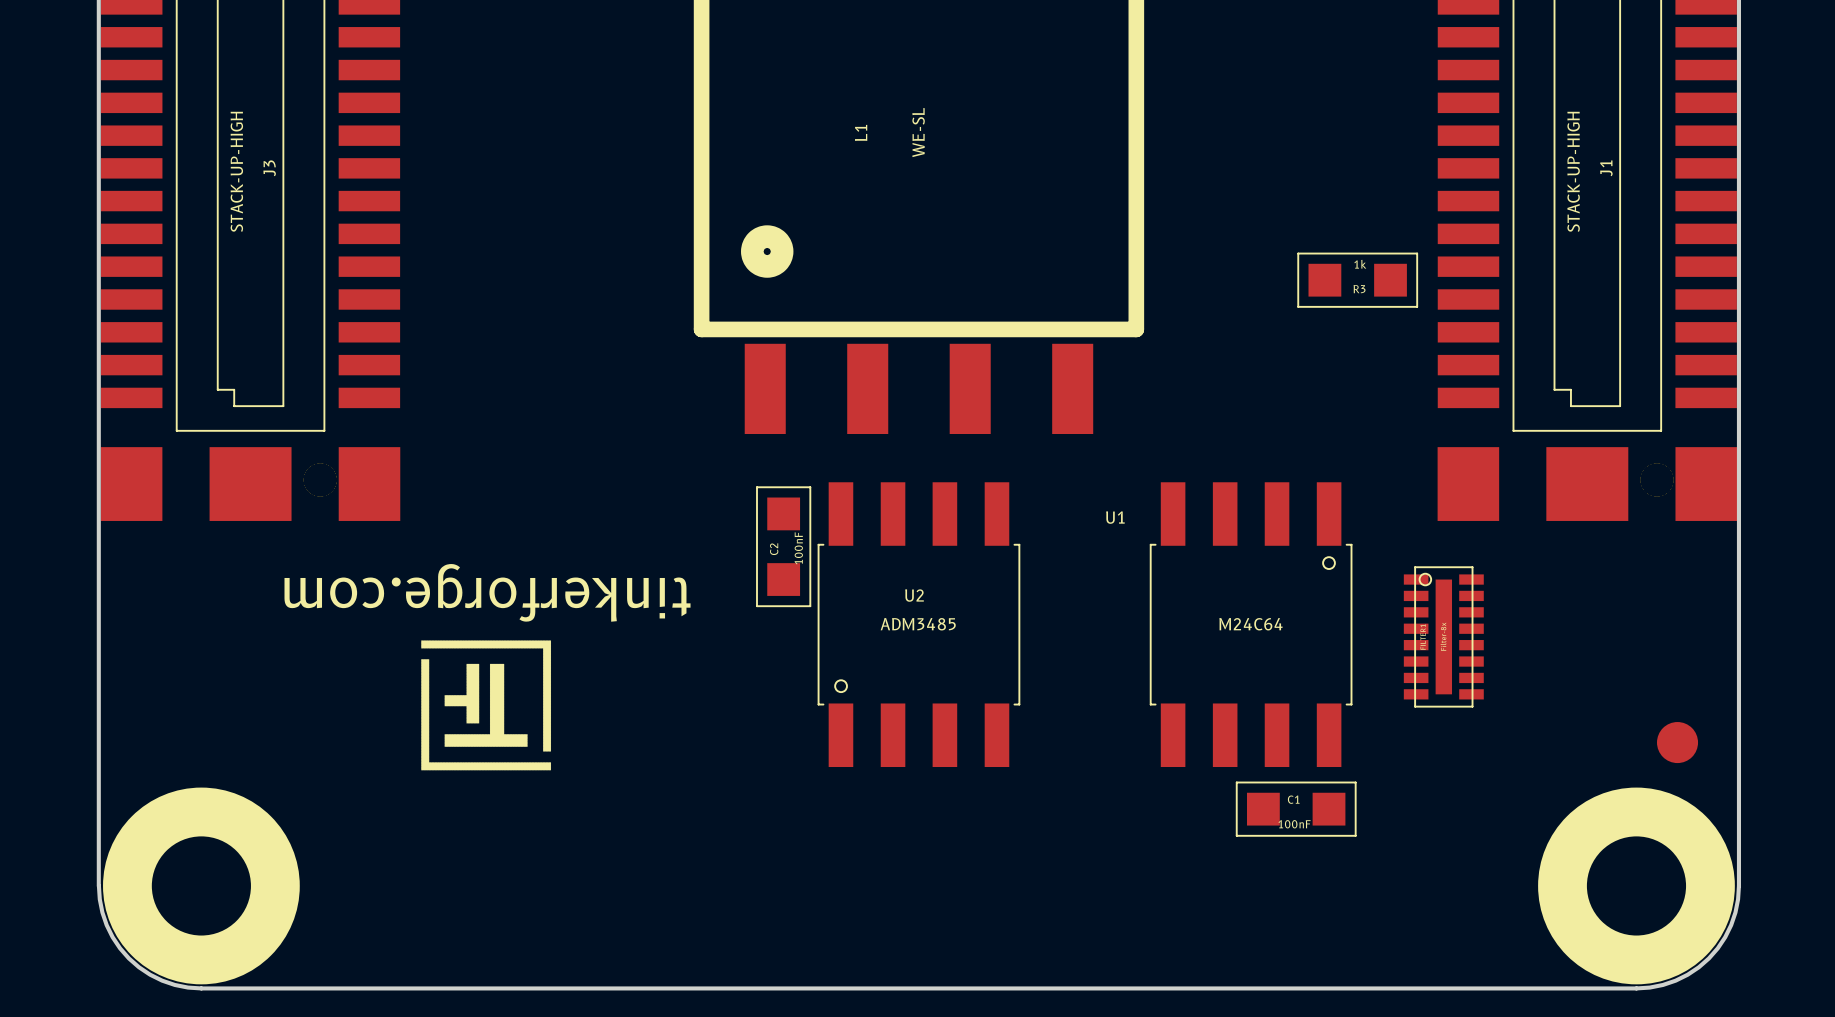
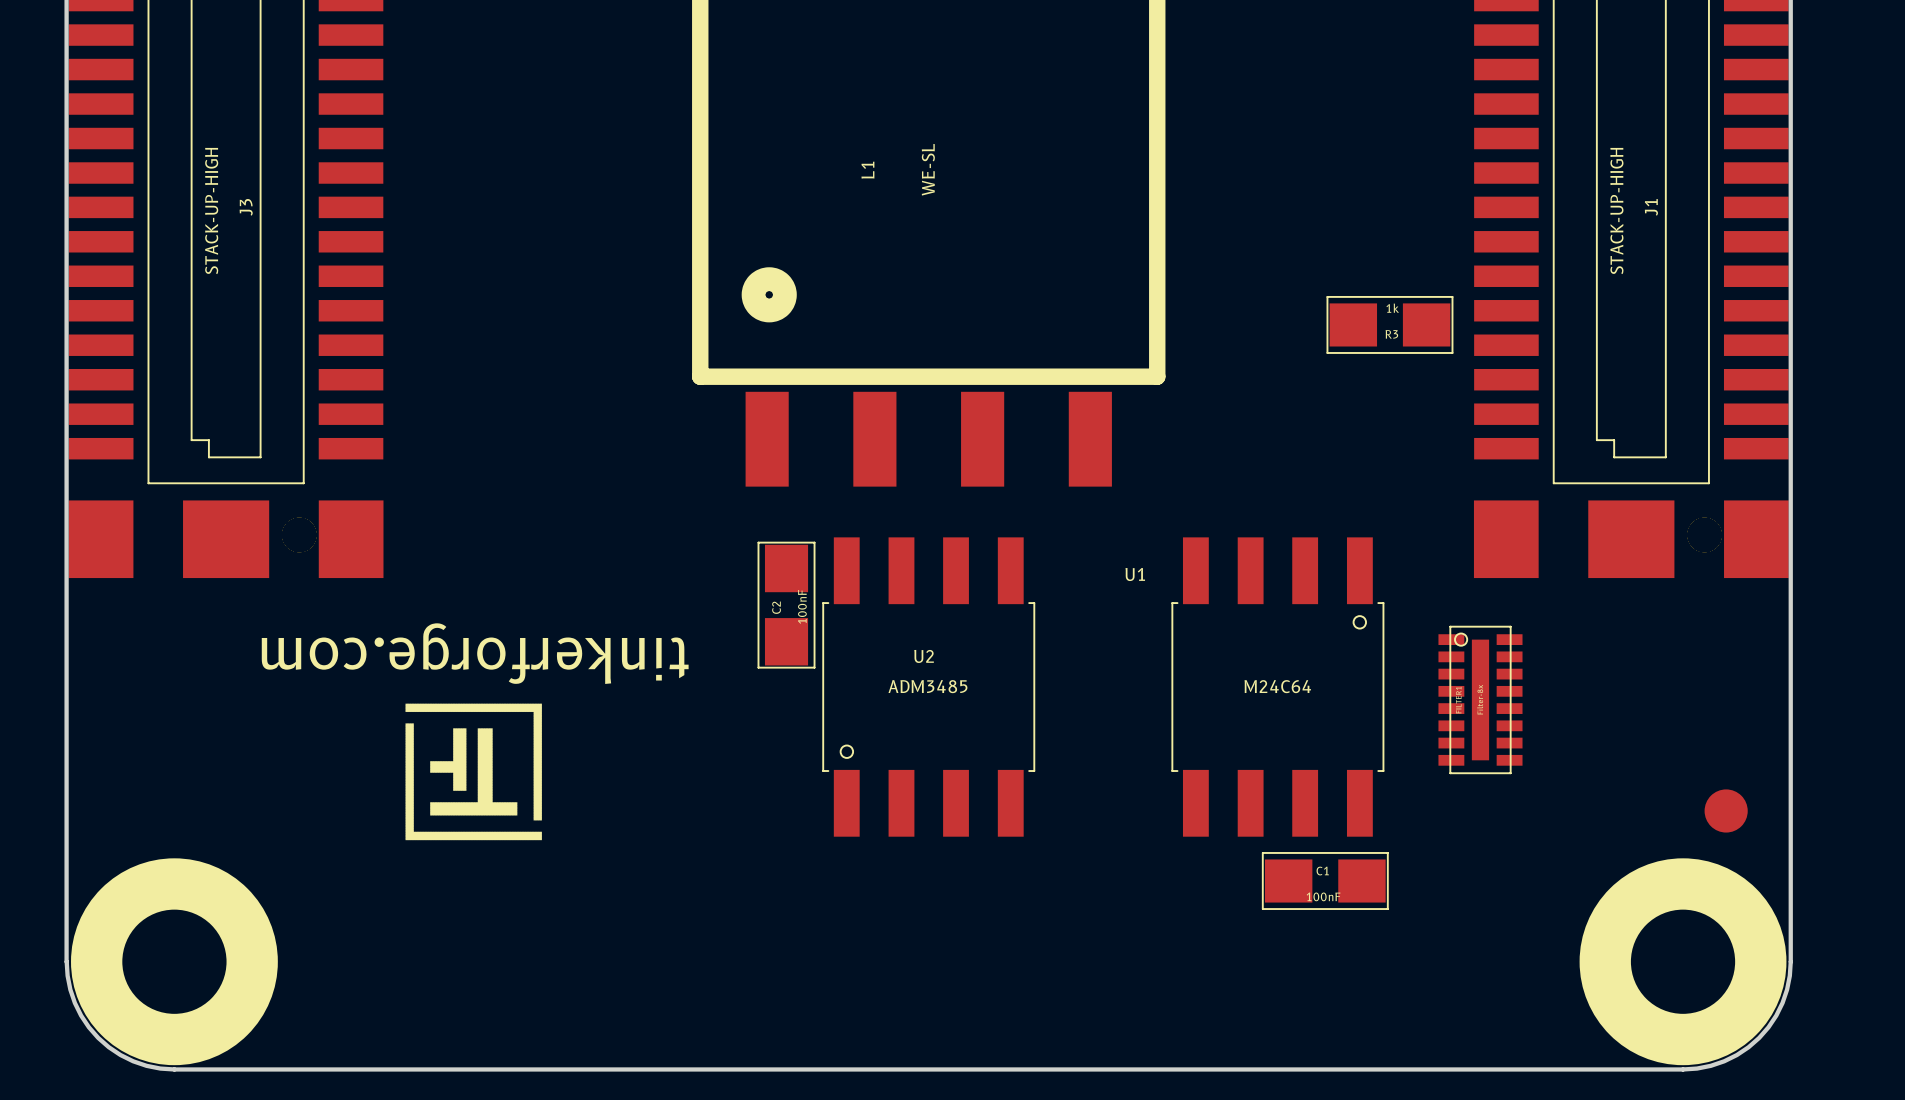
R3 footprint: [1298, 253, 1418, 307] -> [1327, 296, 1453, 354]
C2 footprint: [756, 487, 811, 607] -> [758, 542, 815, 668]
C1 footprint: [1236, 782, 1356, 836] -> [1262, 852, 1388, 910]

